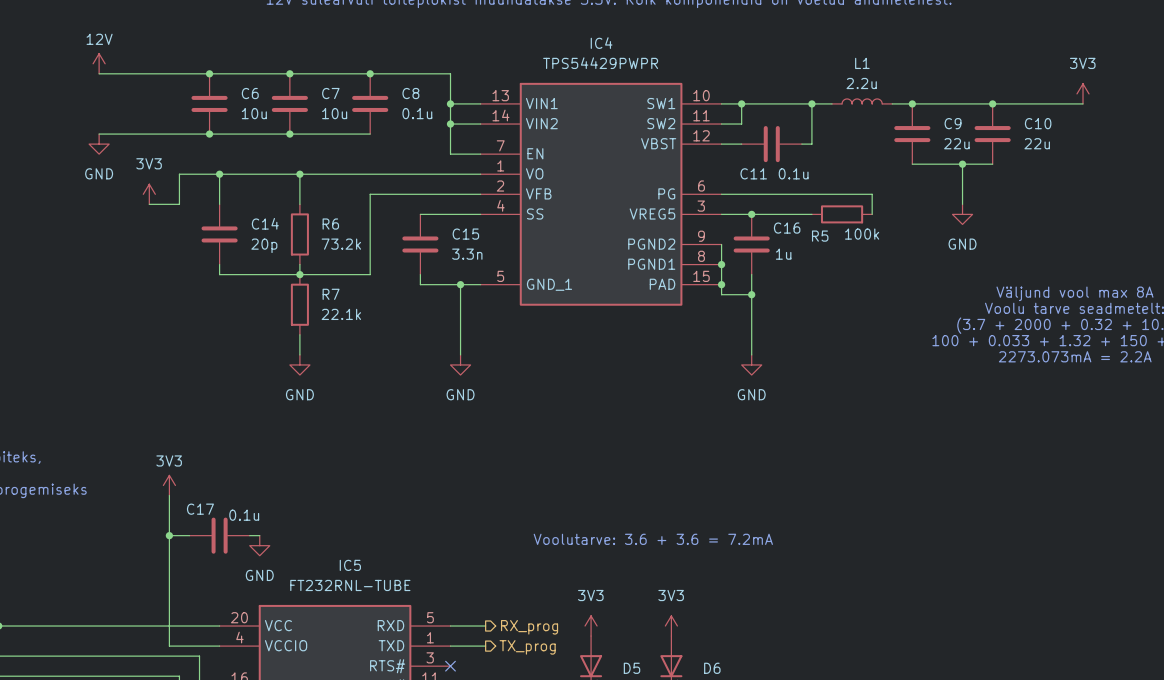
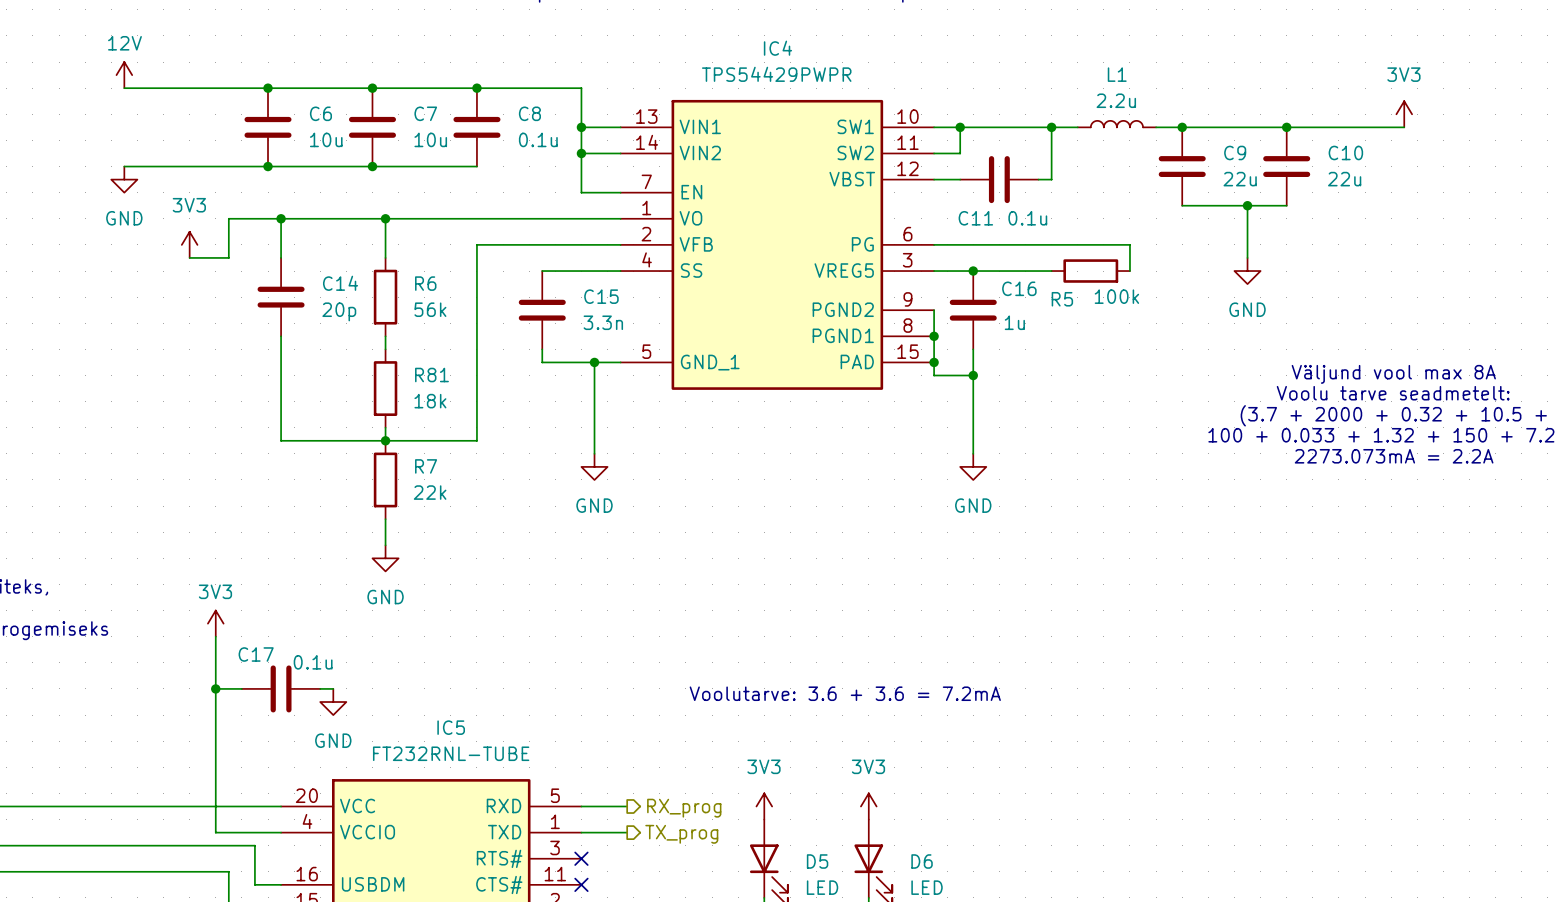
R6 value: 73.2k (341, 244) -> 56k (430, 309)
wire: (219, 274) (370, 274) -> (281, 349) (281, 440) (476, 440) (476, 349)
junction: (299, 274) -> none
R7 name: R7 (331, 294) -> R81 (431, 375)
R7 value: 22.1k (341, 314) -> 18k (430, 401)
junction: none -> (385, 440)
power symbol position: GND (299, 364) -> GND (385, 558)
R7: none -> 22k (385, 479)
wire: none -> (385, 519) (385, 545)

